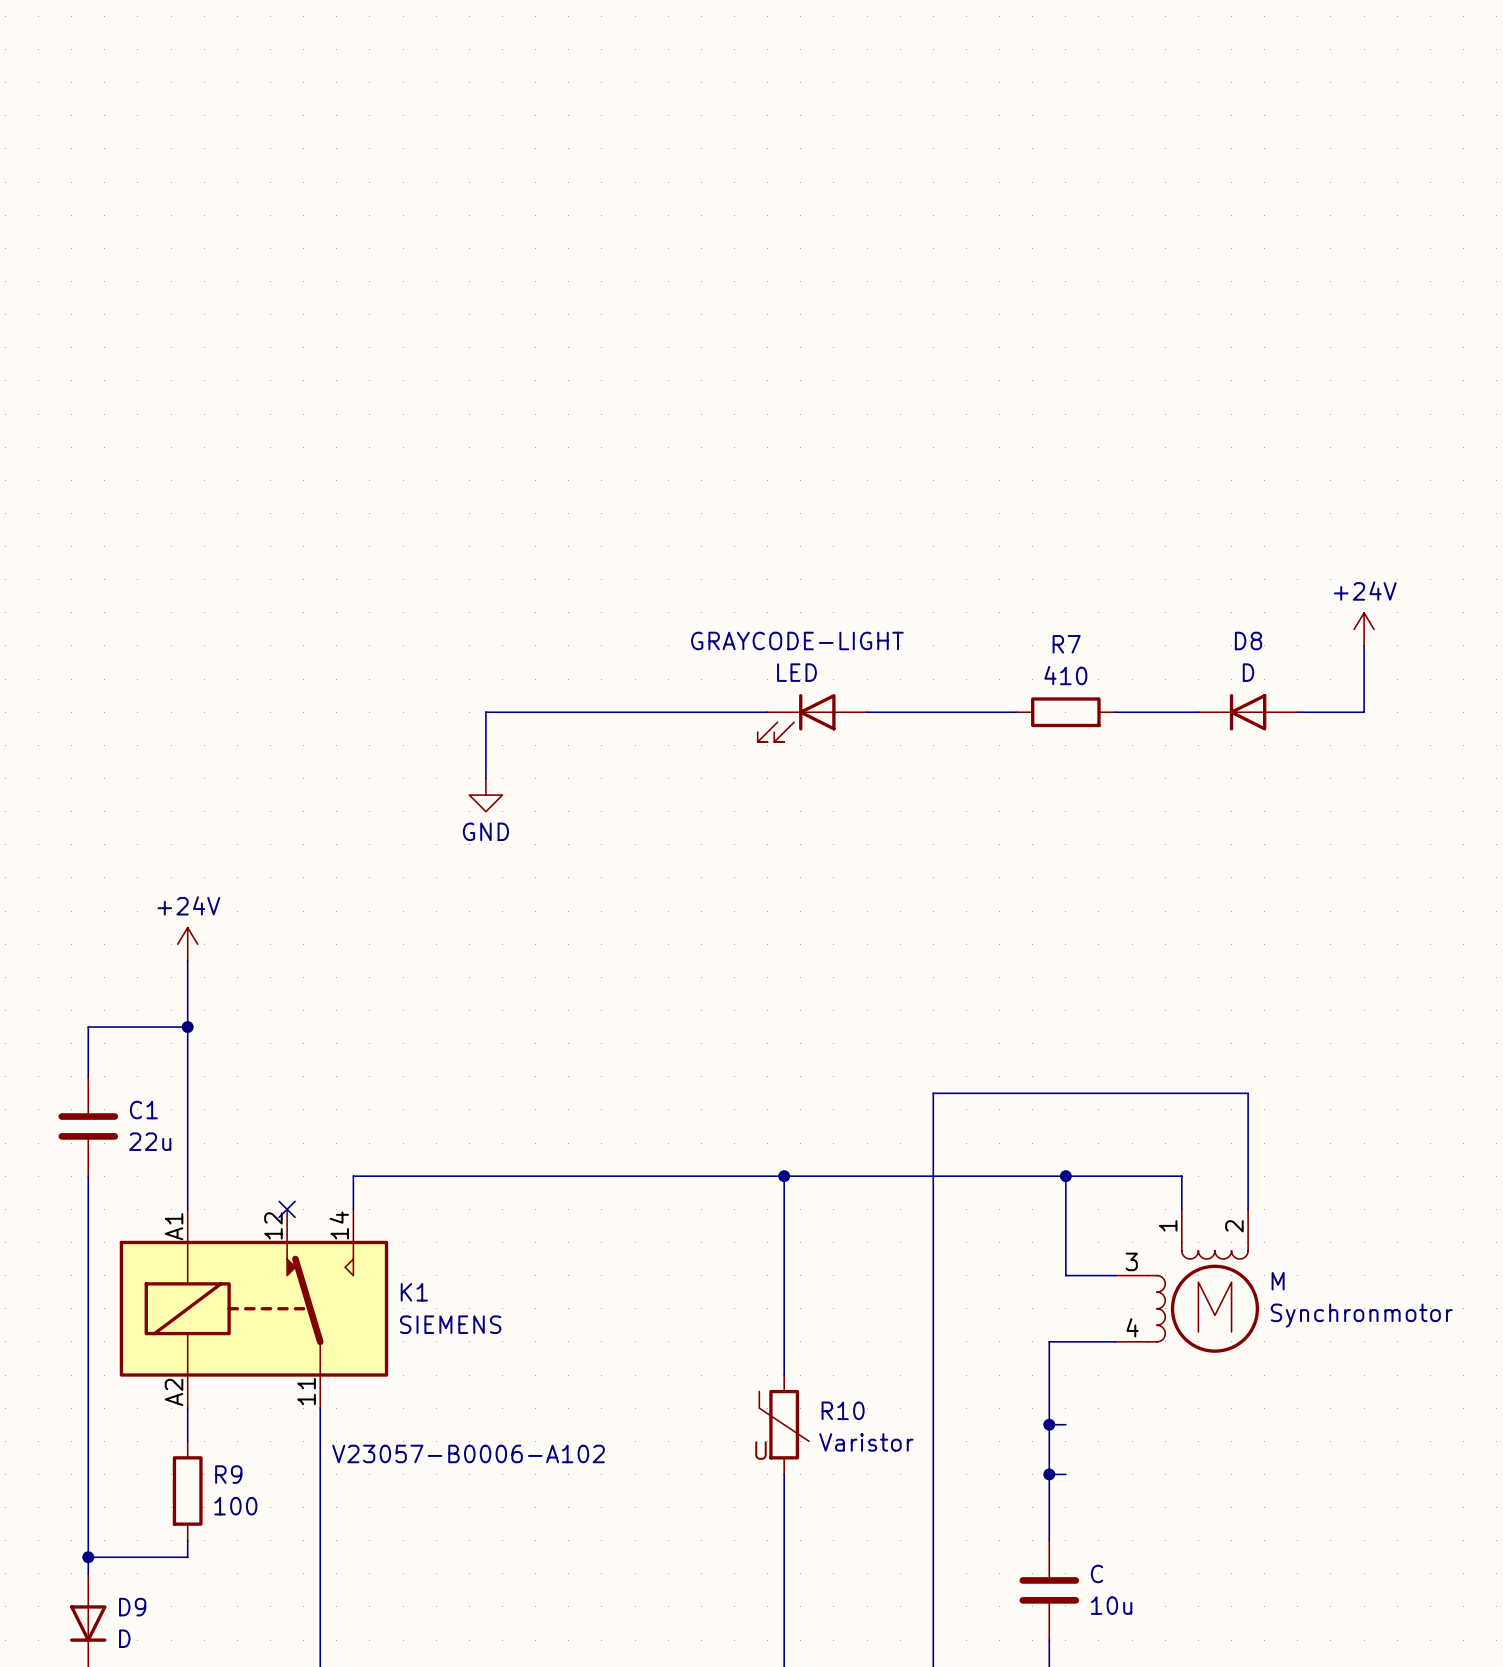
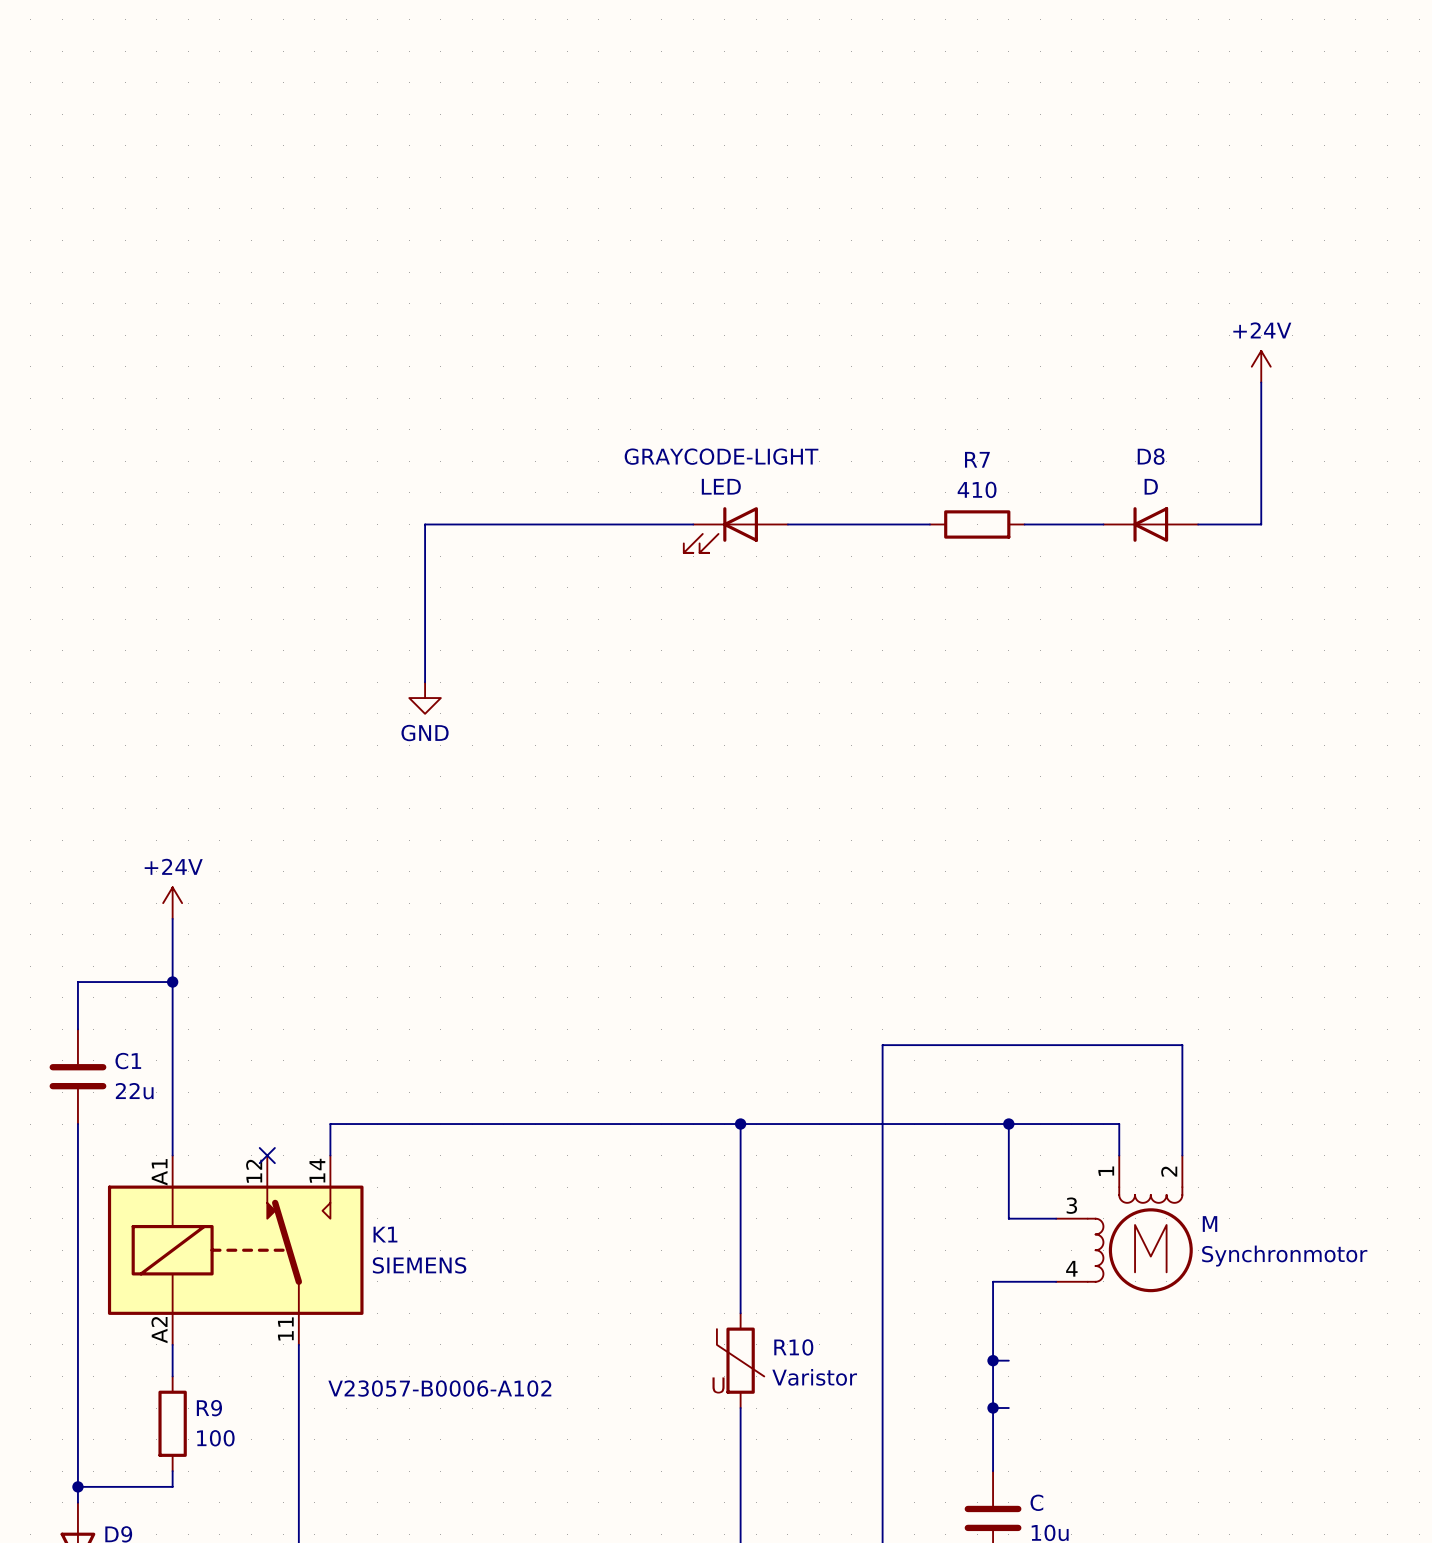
wire: none -> (1261, 382) (1261, 524) (1198, 524)
wire: none -> (693, 524) (425, 524) (425, 682)
power symbol position: +24V (1364, 629) -> +24V (1261, 366)
wire: (1364, 645) (1364, 712) (1297, 712) -> none
wire: (767, 712) (485, 712) (485, 778) -> none
wire: (867, 712) (1016, 712) -> (787, 524) (929, 524)
R7 position: (1065, 712) -> (977, 524)
wire: (1115, 712) (1198, 712) -> (1024, 524) (1103, 524)
D8 position: (1248, 712) -> (1150, 524)
GRAYCODE-LIGHT position: (812, 718) -> (735, 530)
power symbol position: GND (485, 795) -> GND (425, 698)

